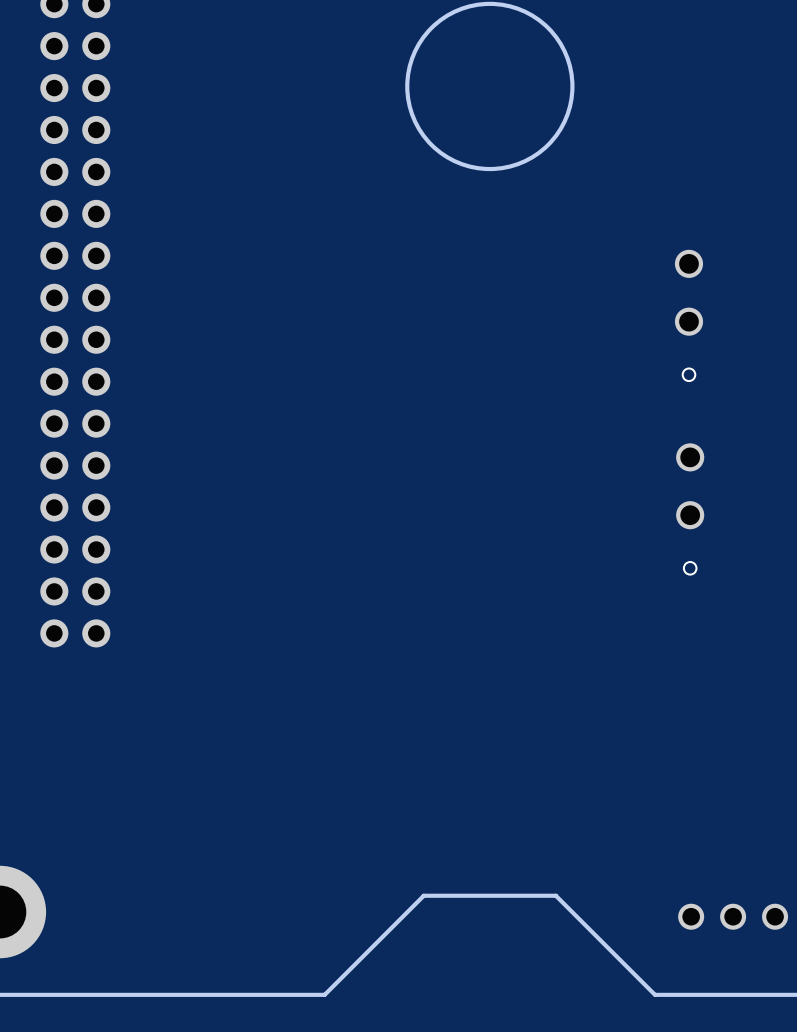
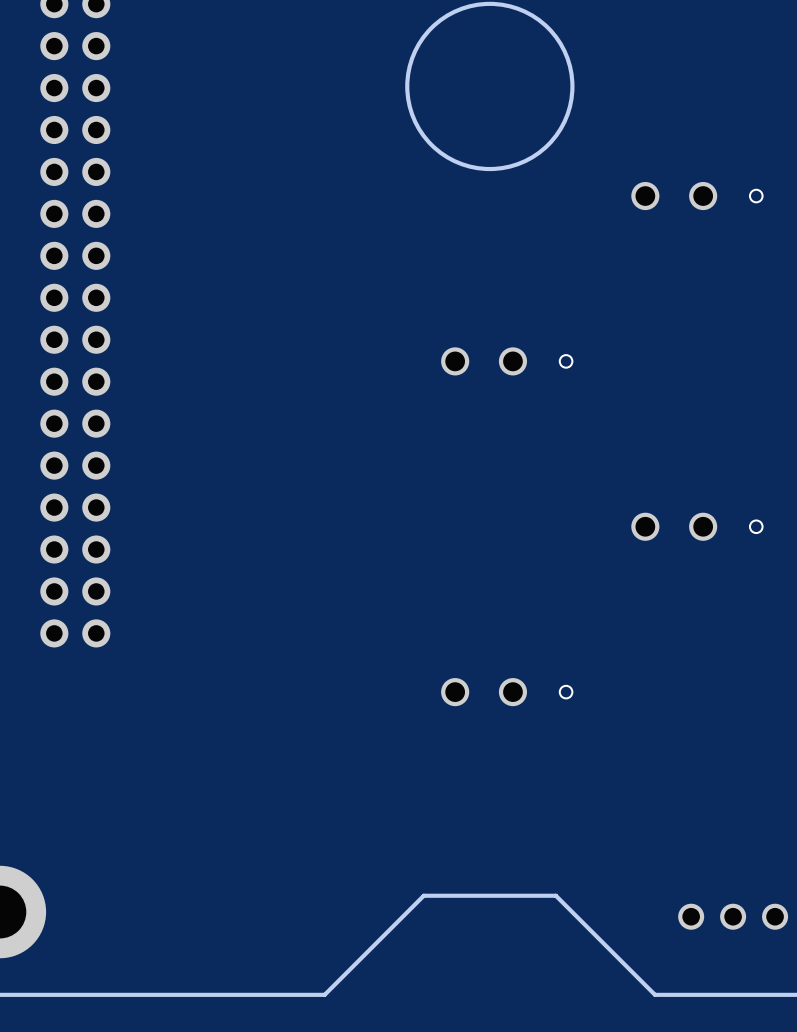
part: none -> (697, 196)
part: (689, 315) -> none
part: none -> (507, 361)
part rotation: 0° (690, 509) -> 90° counterclockwise (697, 526)
part: none -> (507, 692)

